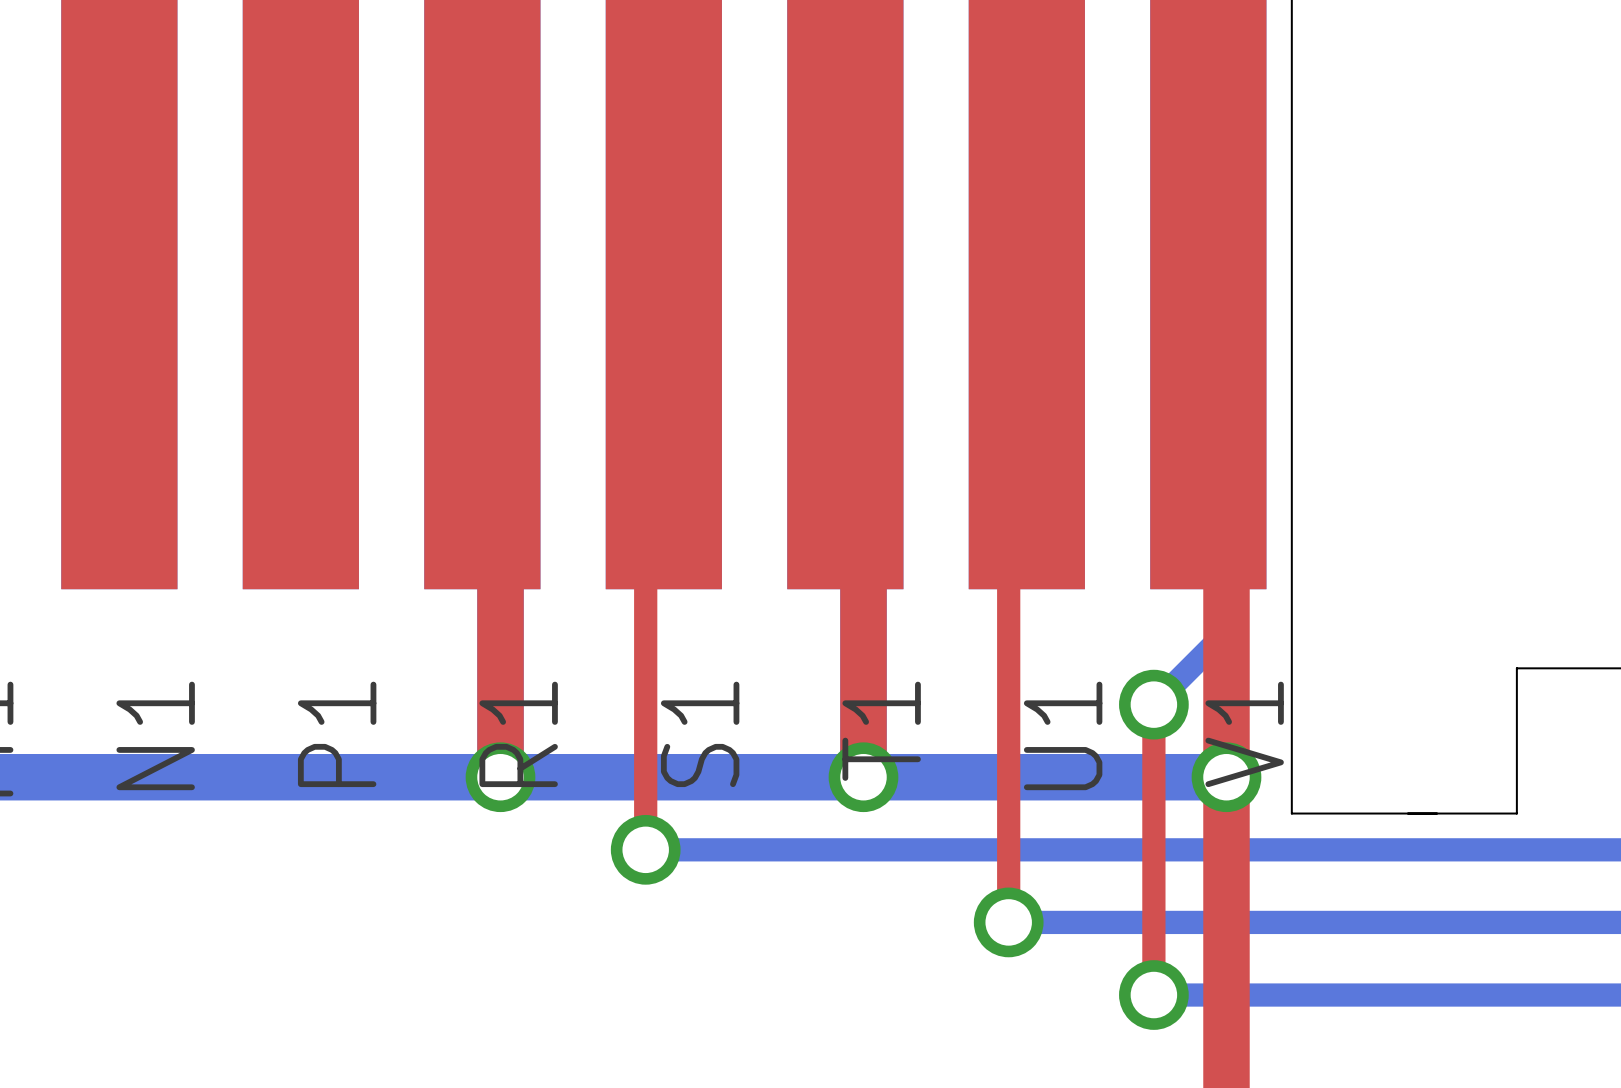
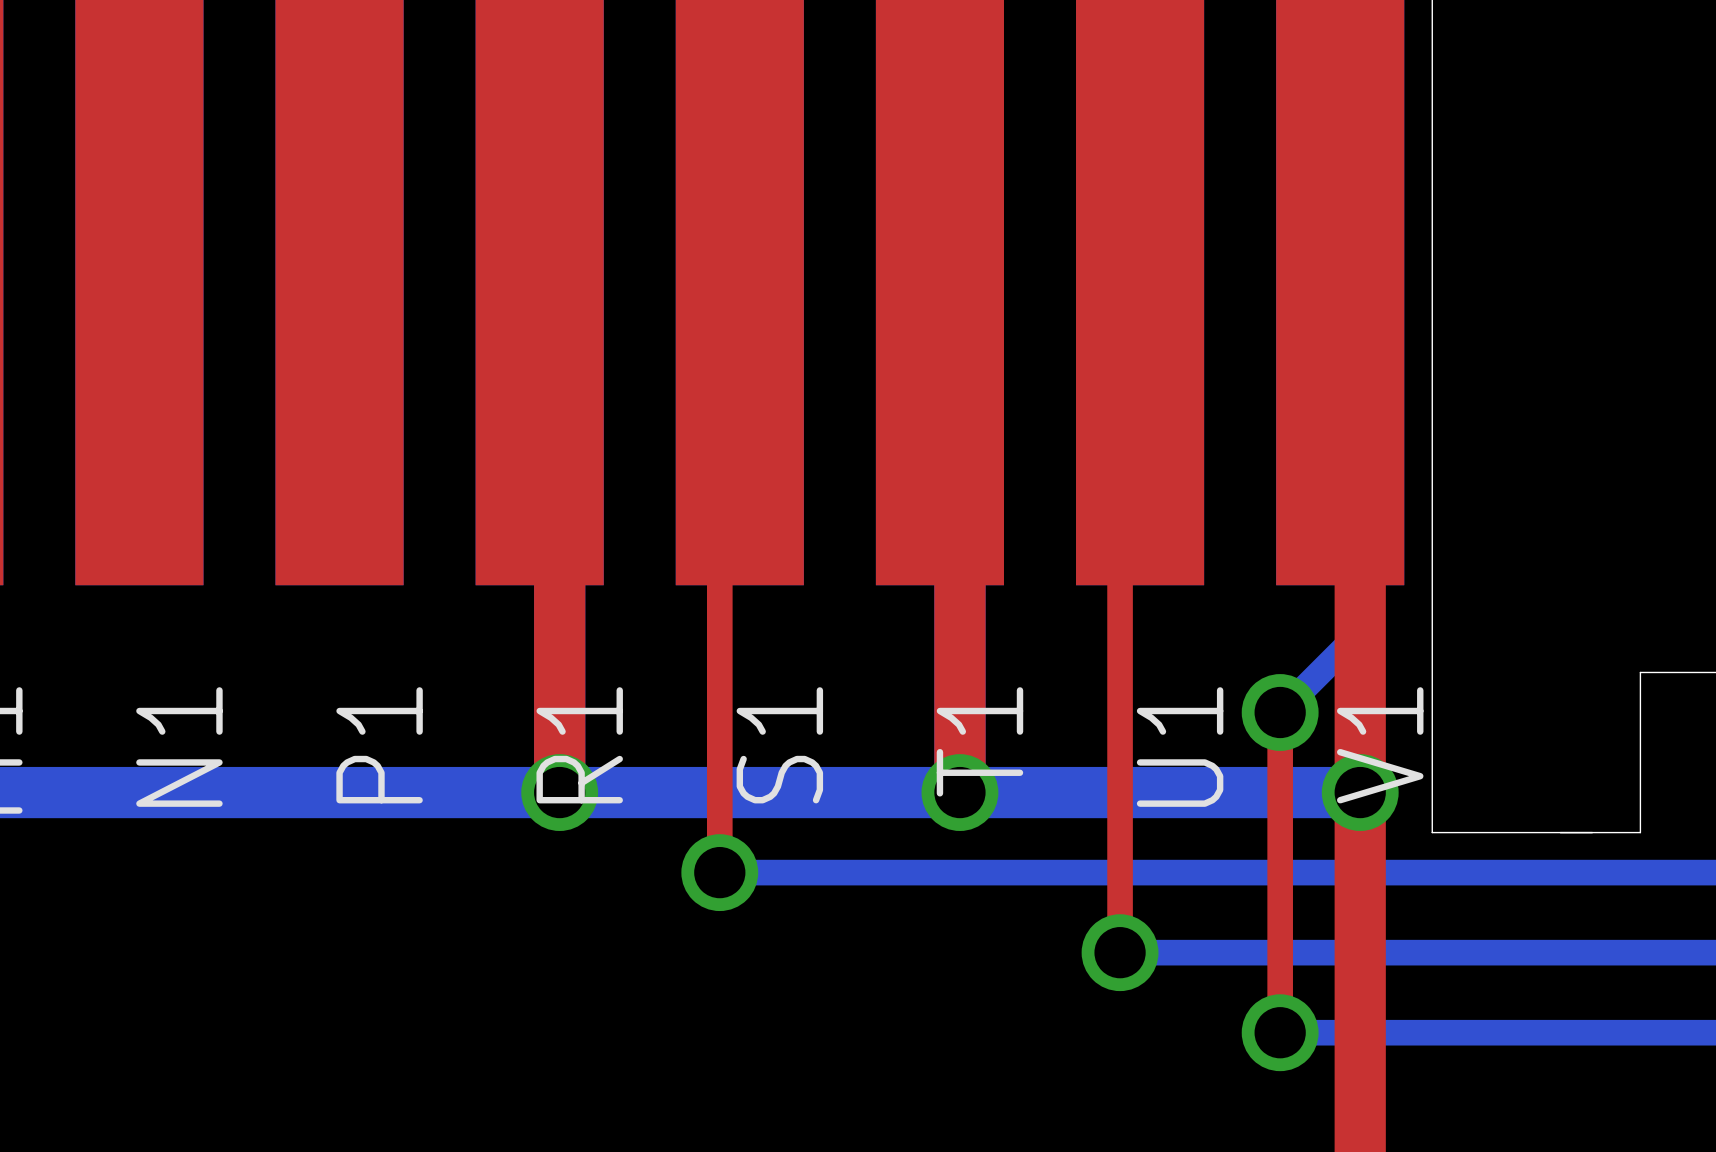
board edge: (1516, 668) (1516, 813) (1480, 813) -> (1680, 672) (1640, 672) (1640, 832)

